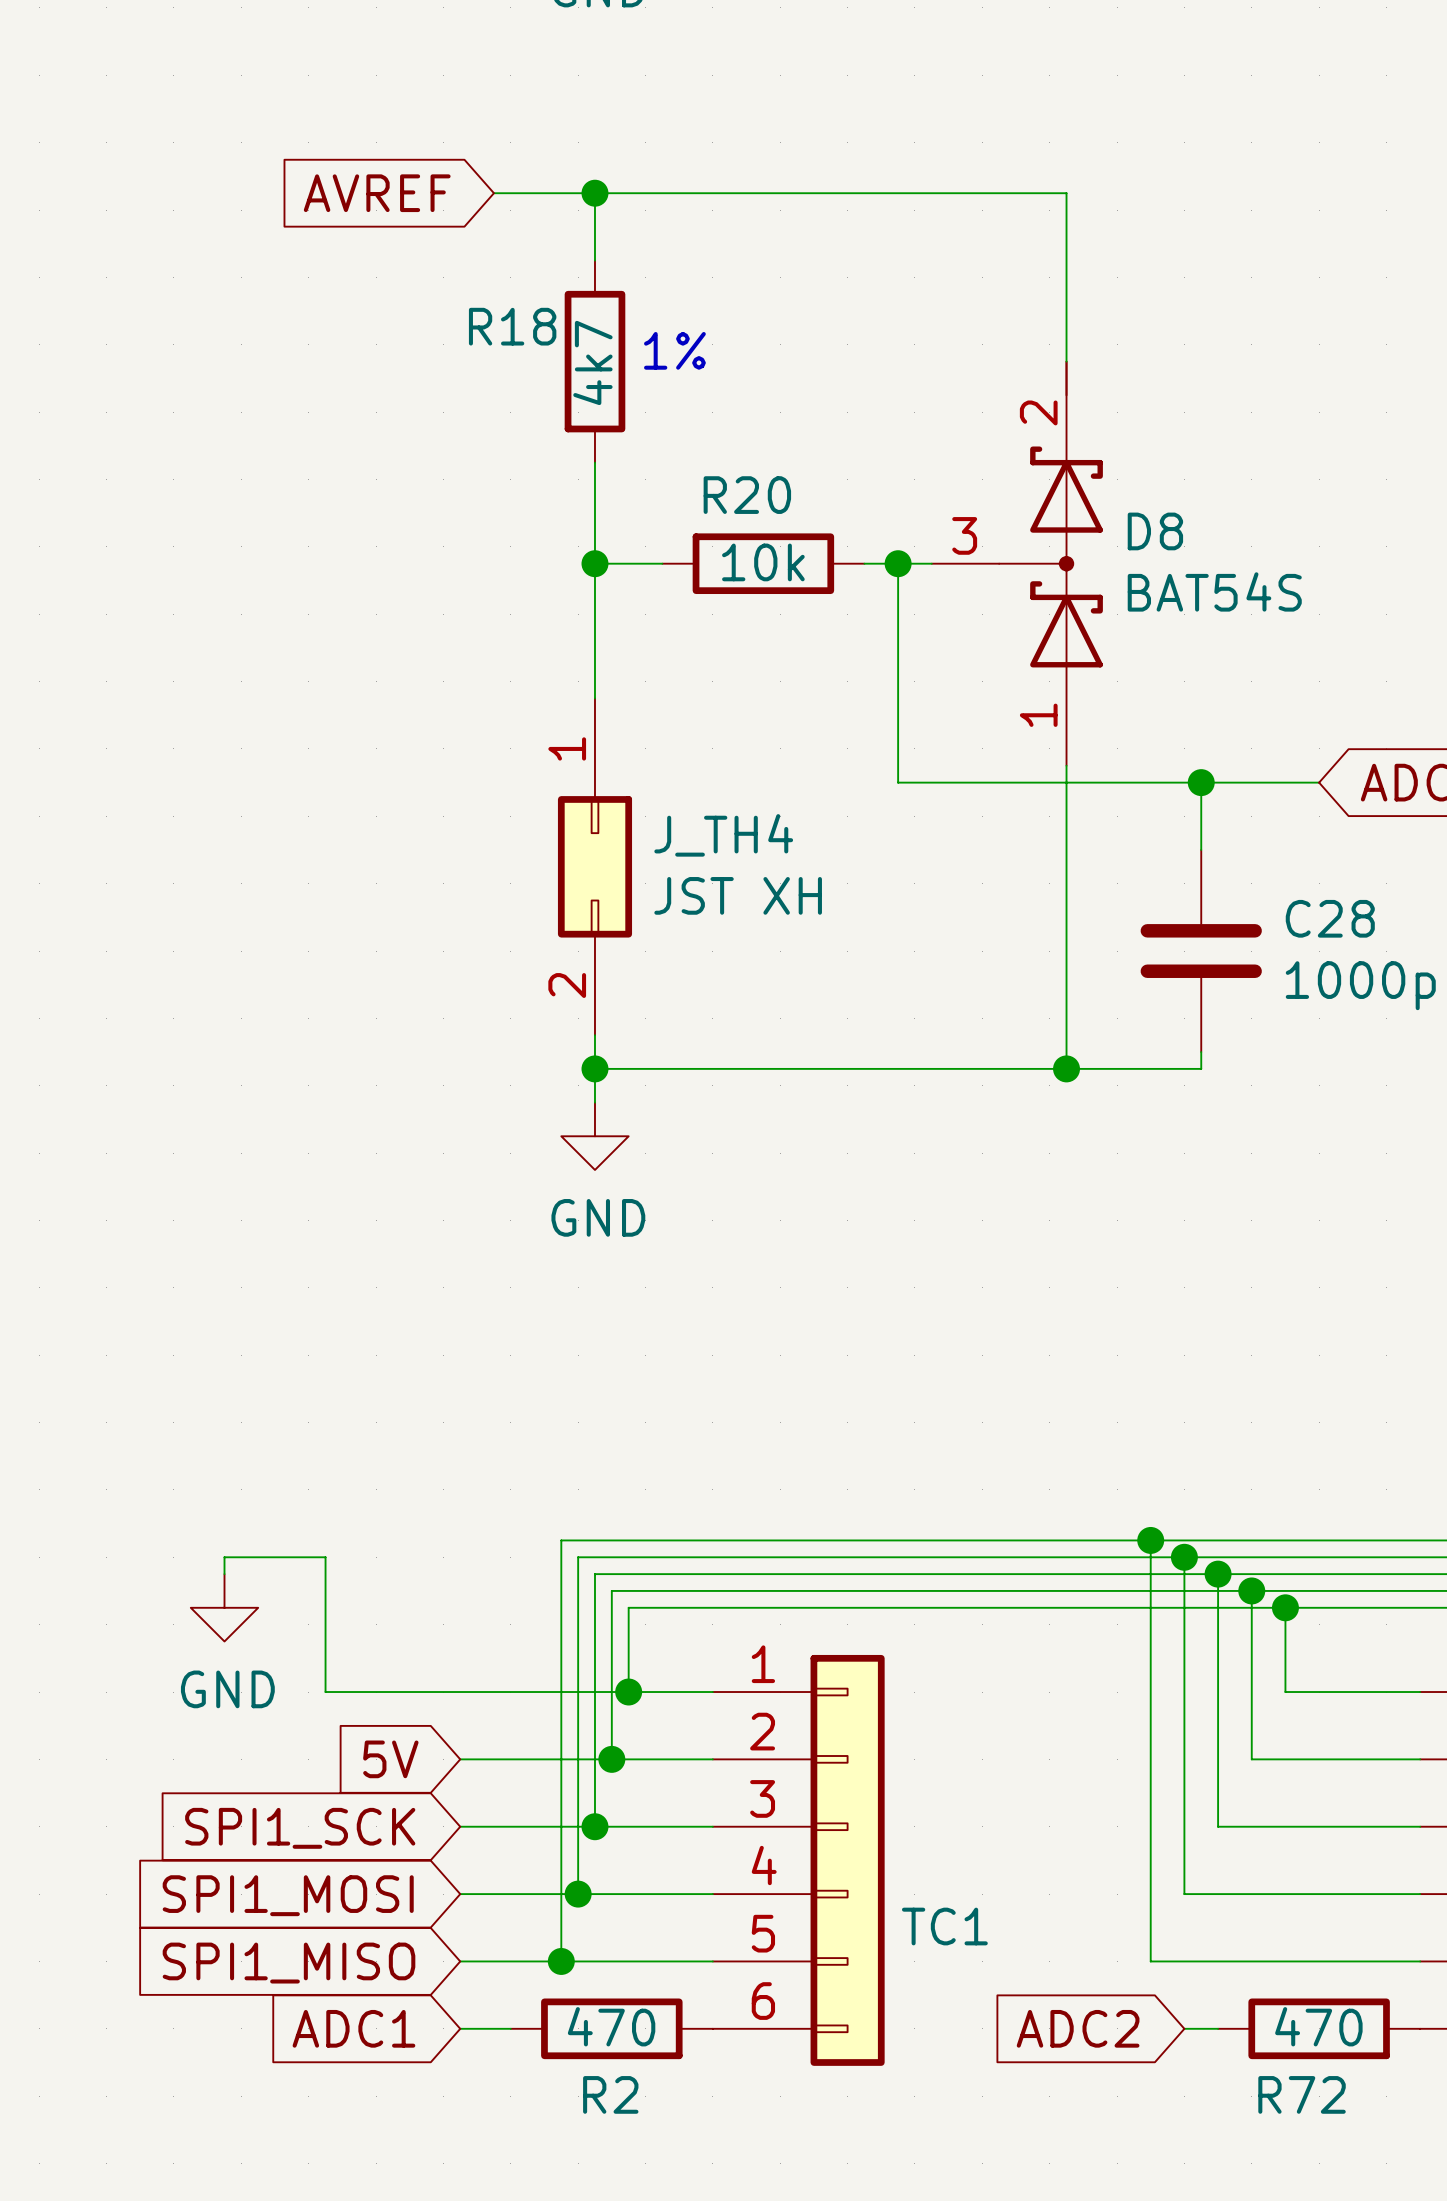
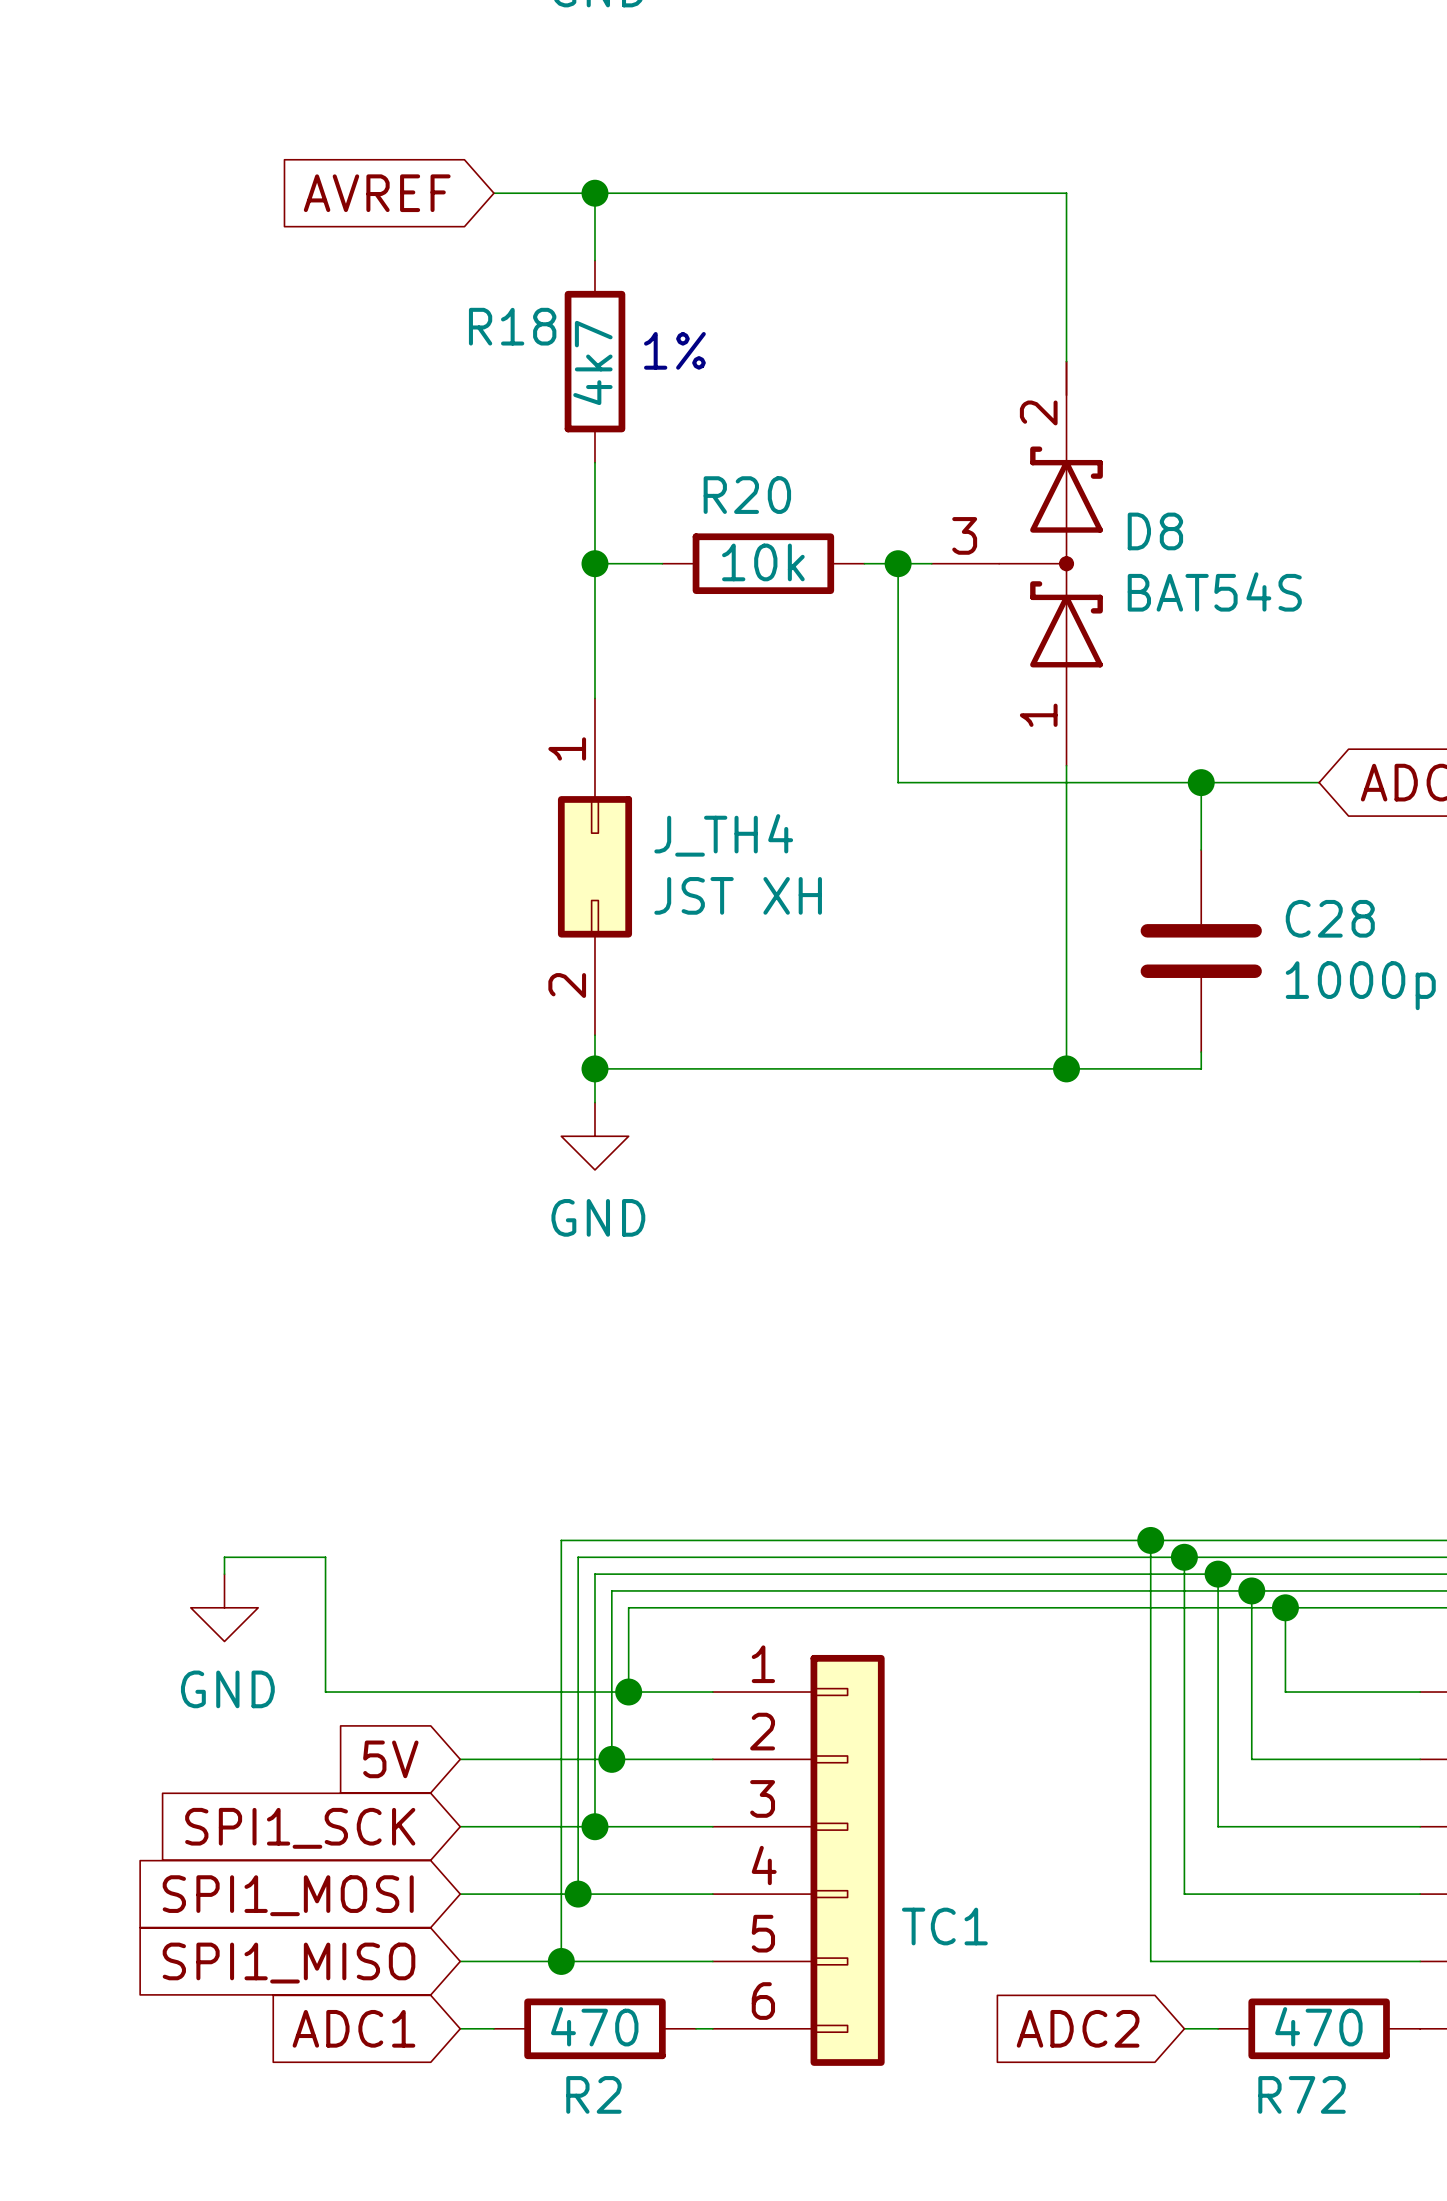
R2 position: (611, 2028) -> (594, 2028)

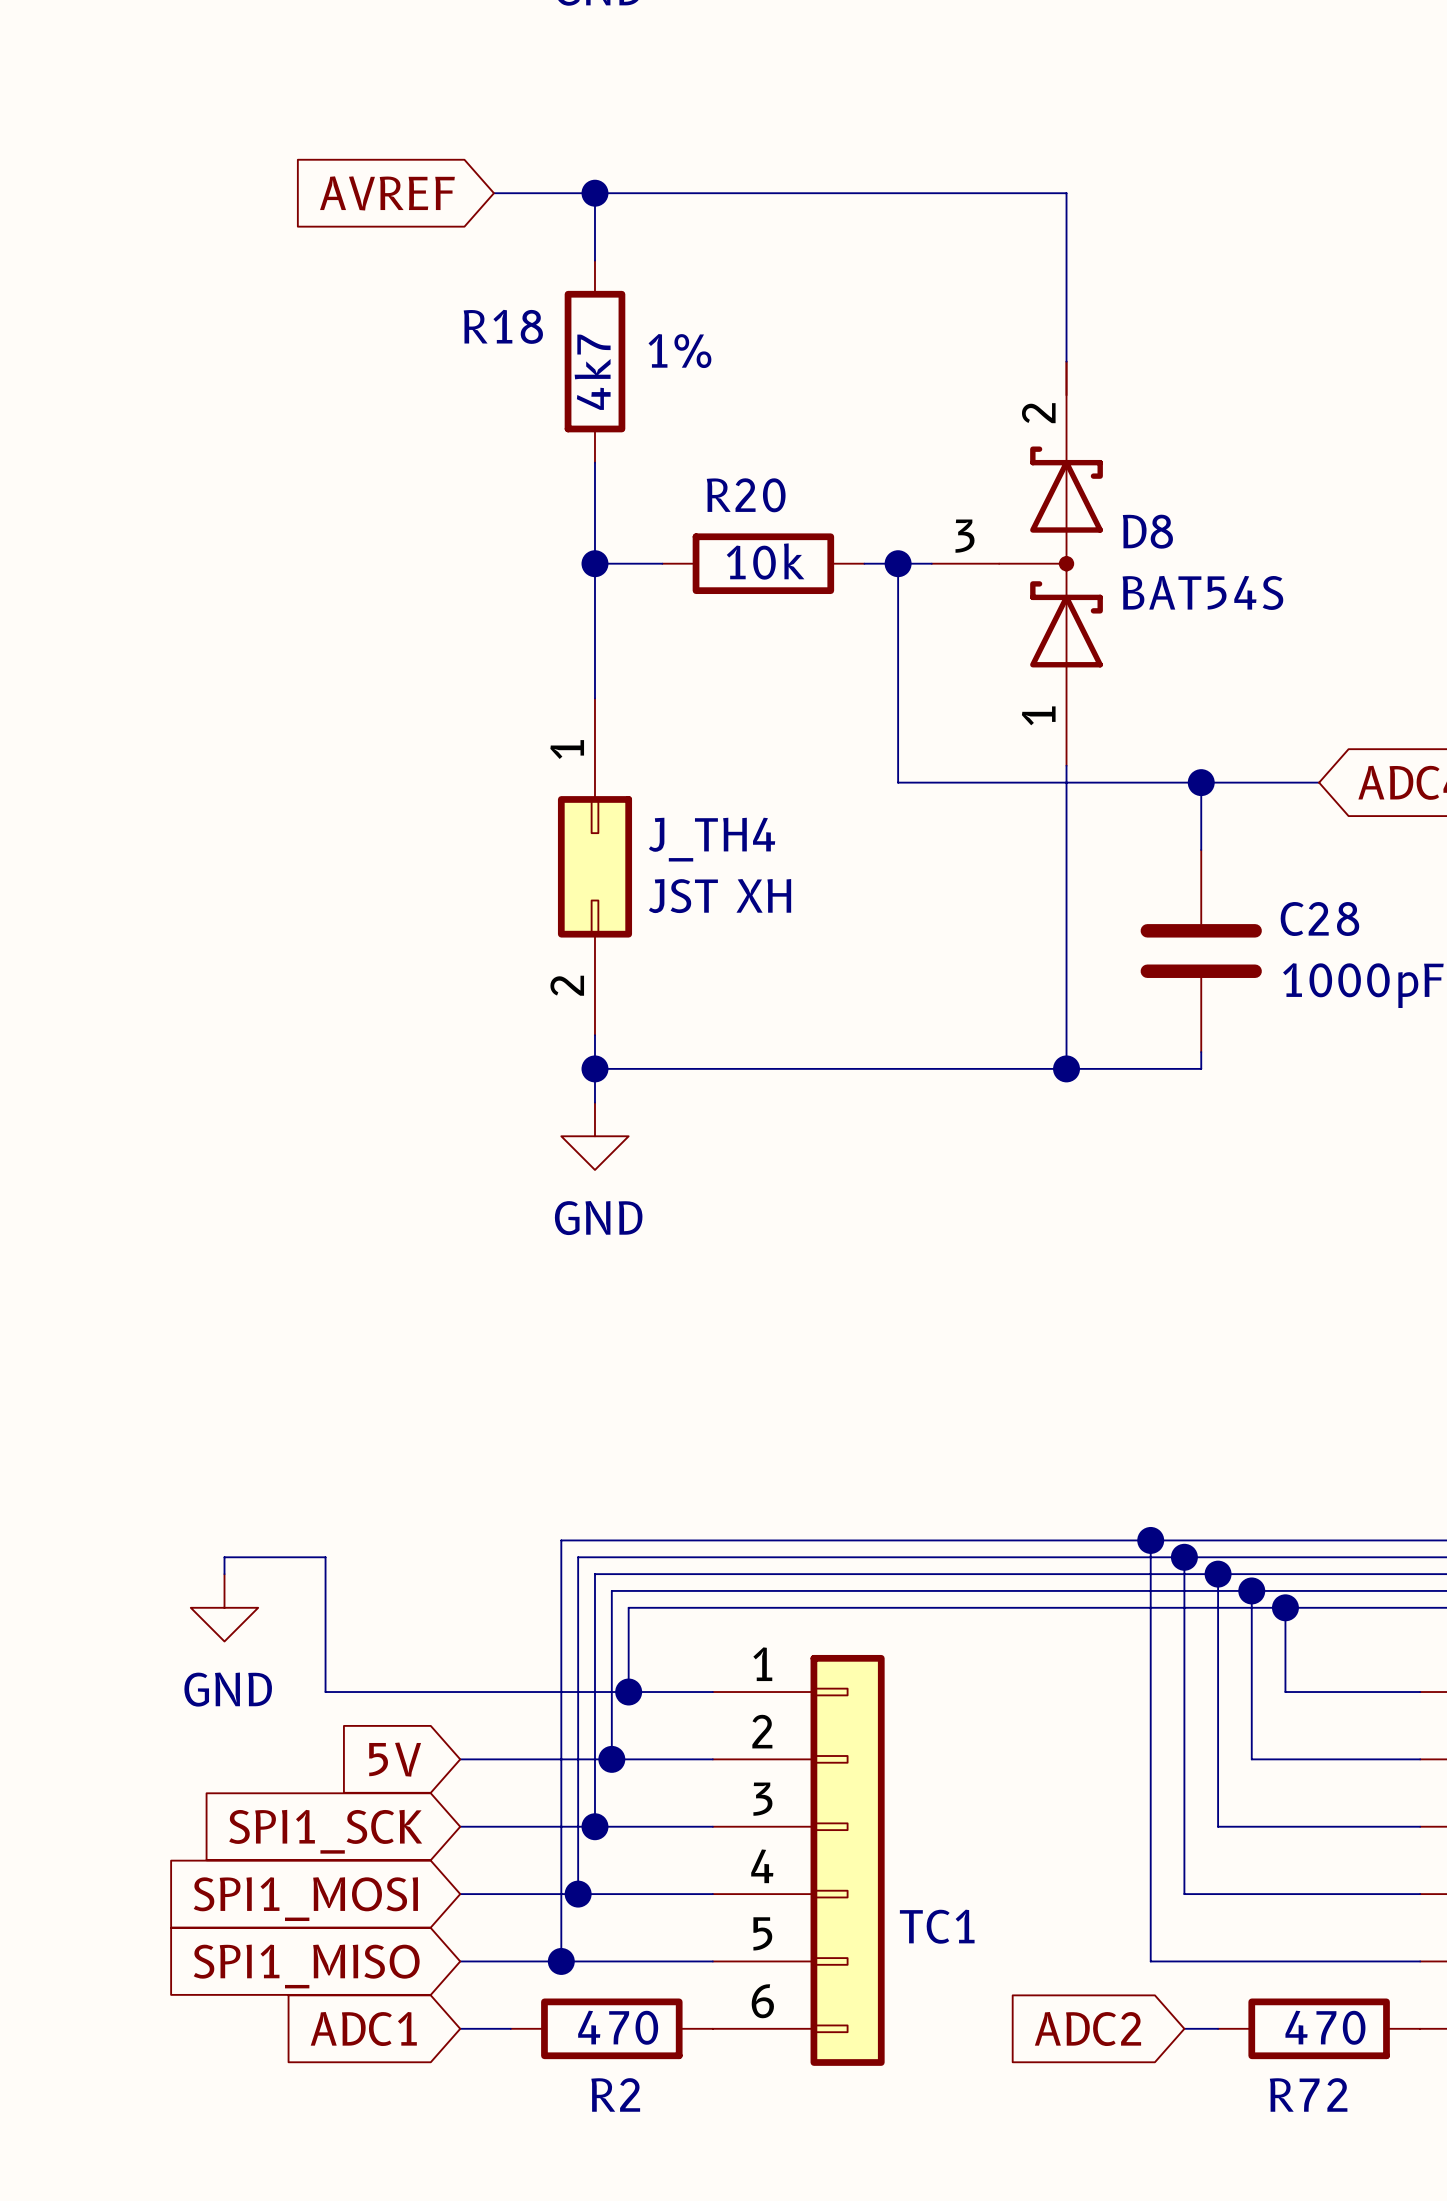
R2 position: (594, 2028) -> (611, 2028)

